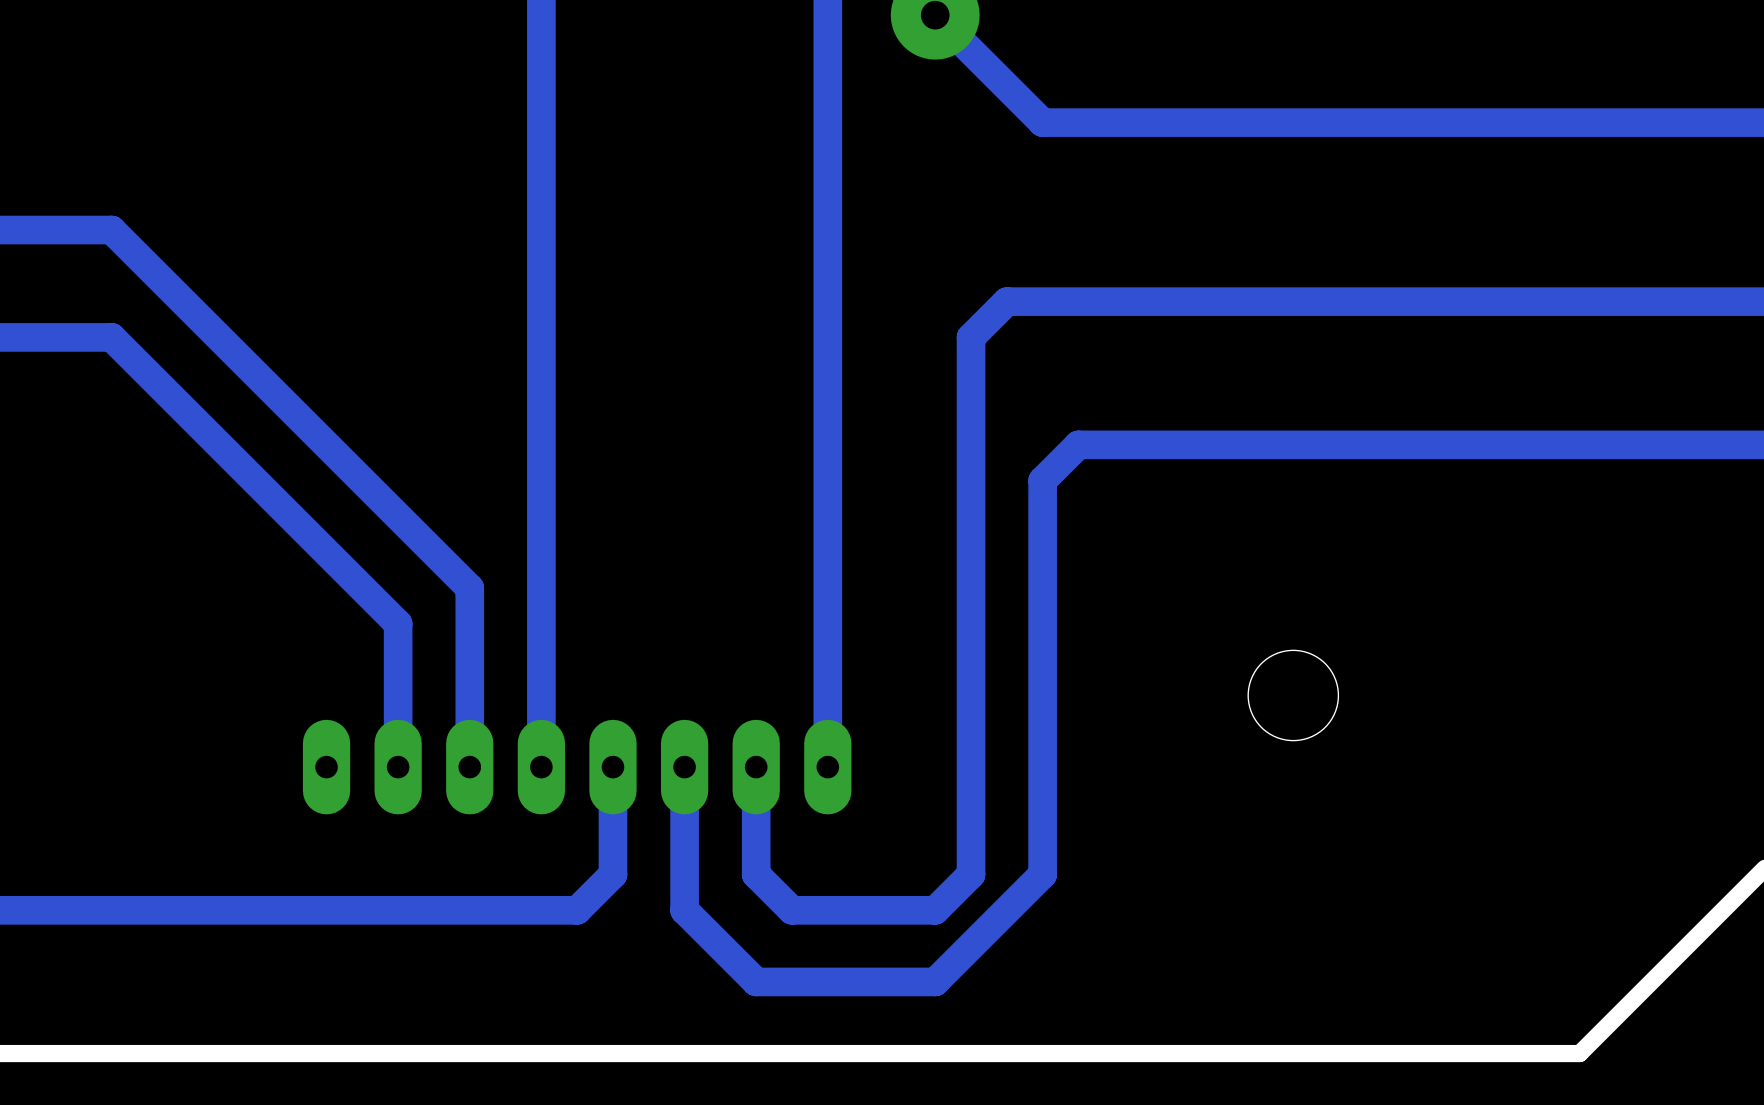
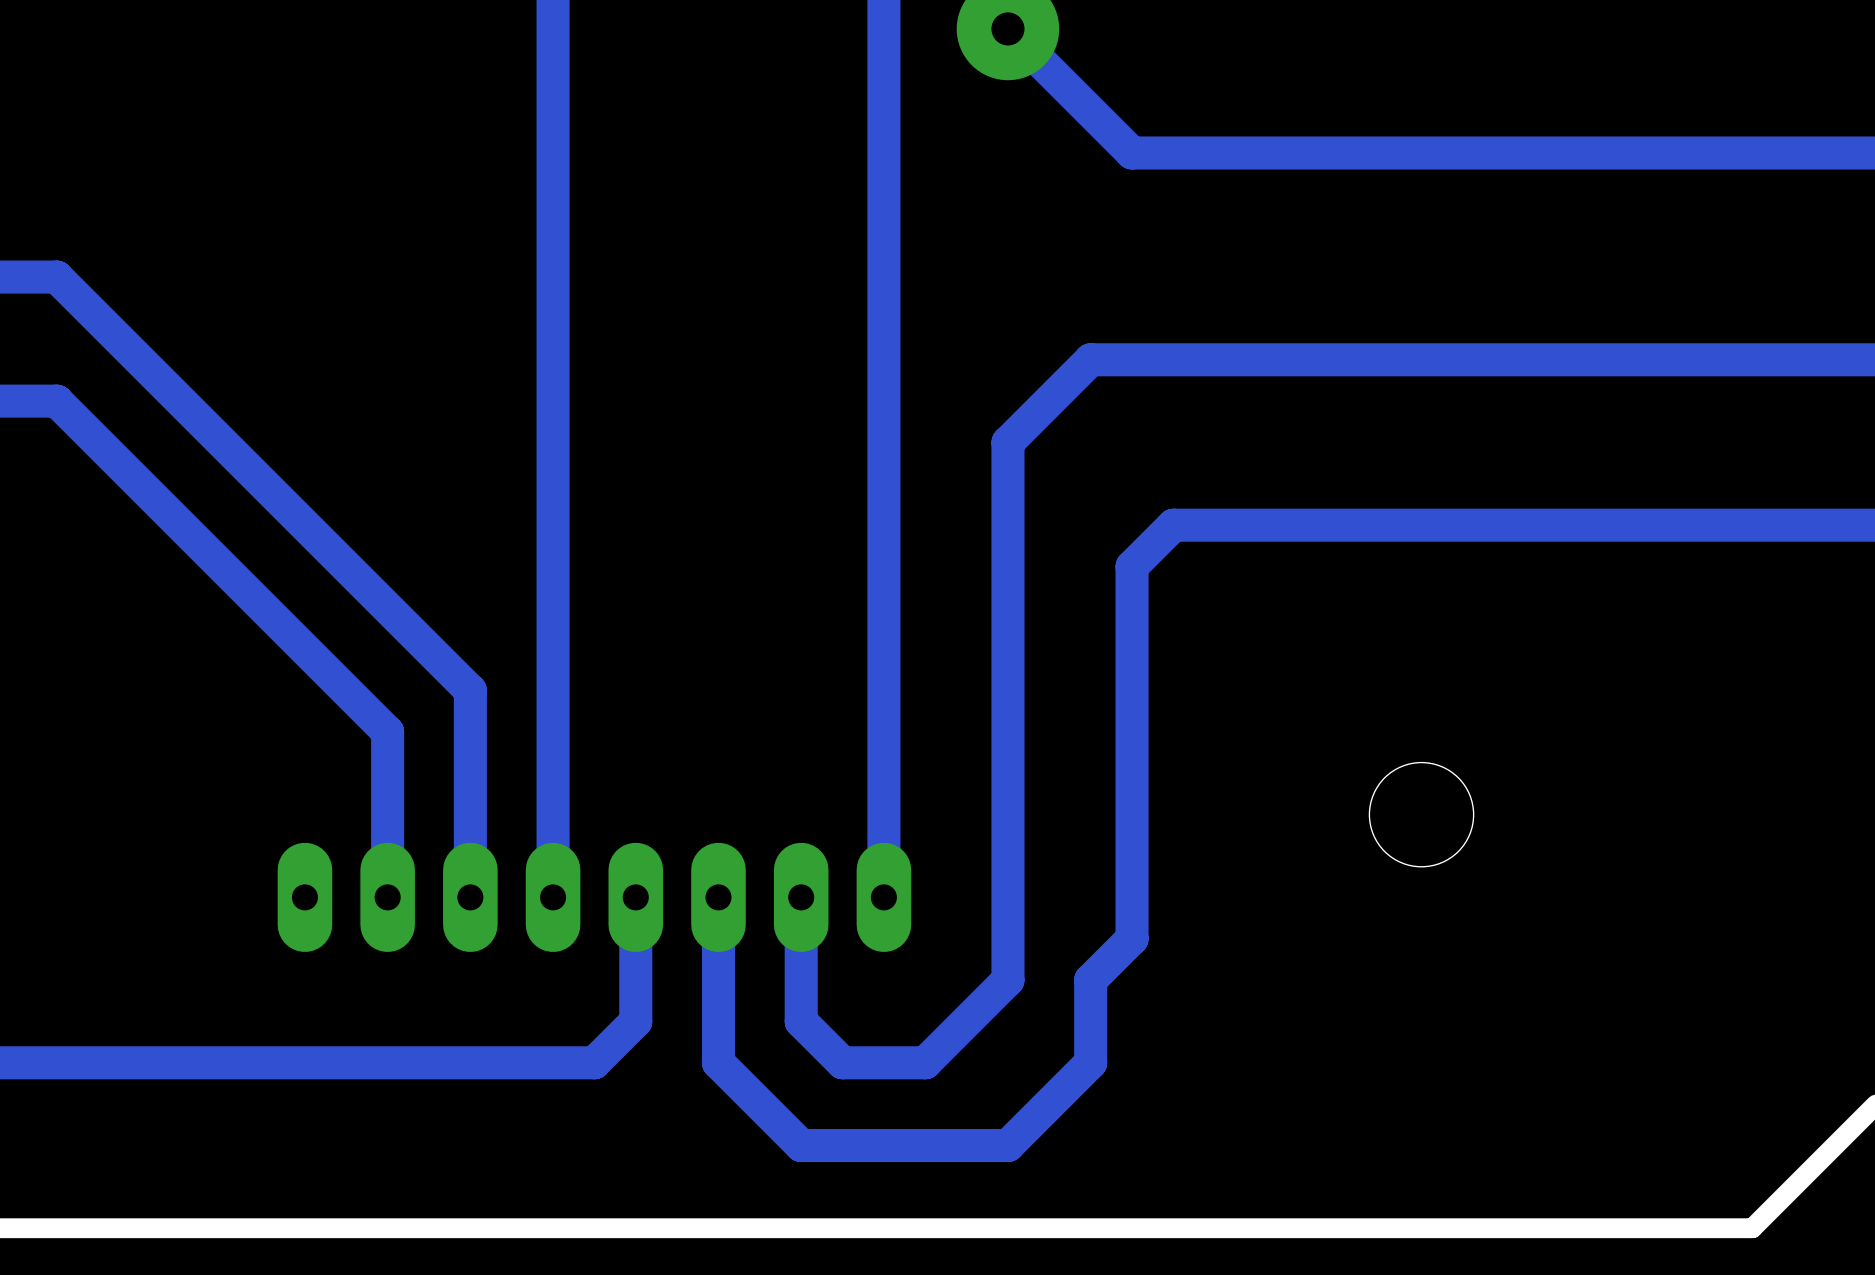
track: (971, 337) (971, 874) (935, 910) (863, 910) -> (1049, 401) (1007, 442) (1007, 980) (925, 1062)
track: (1042, 802) (1042, 874) (1006, 910) -> (1132, 938) (1090, 980) (1090, 1062)

